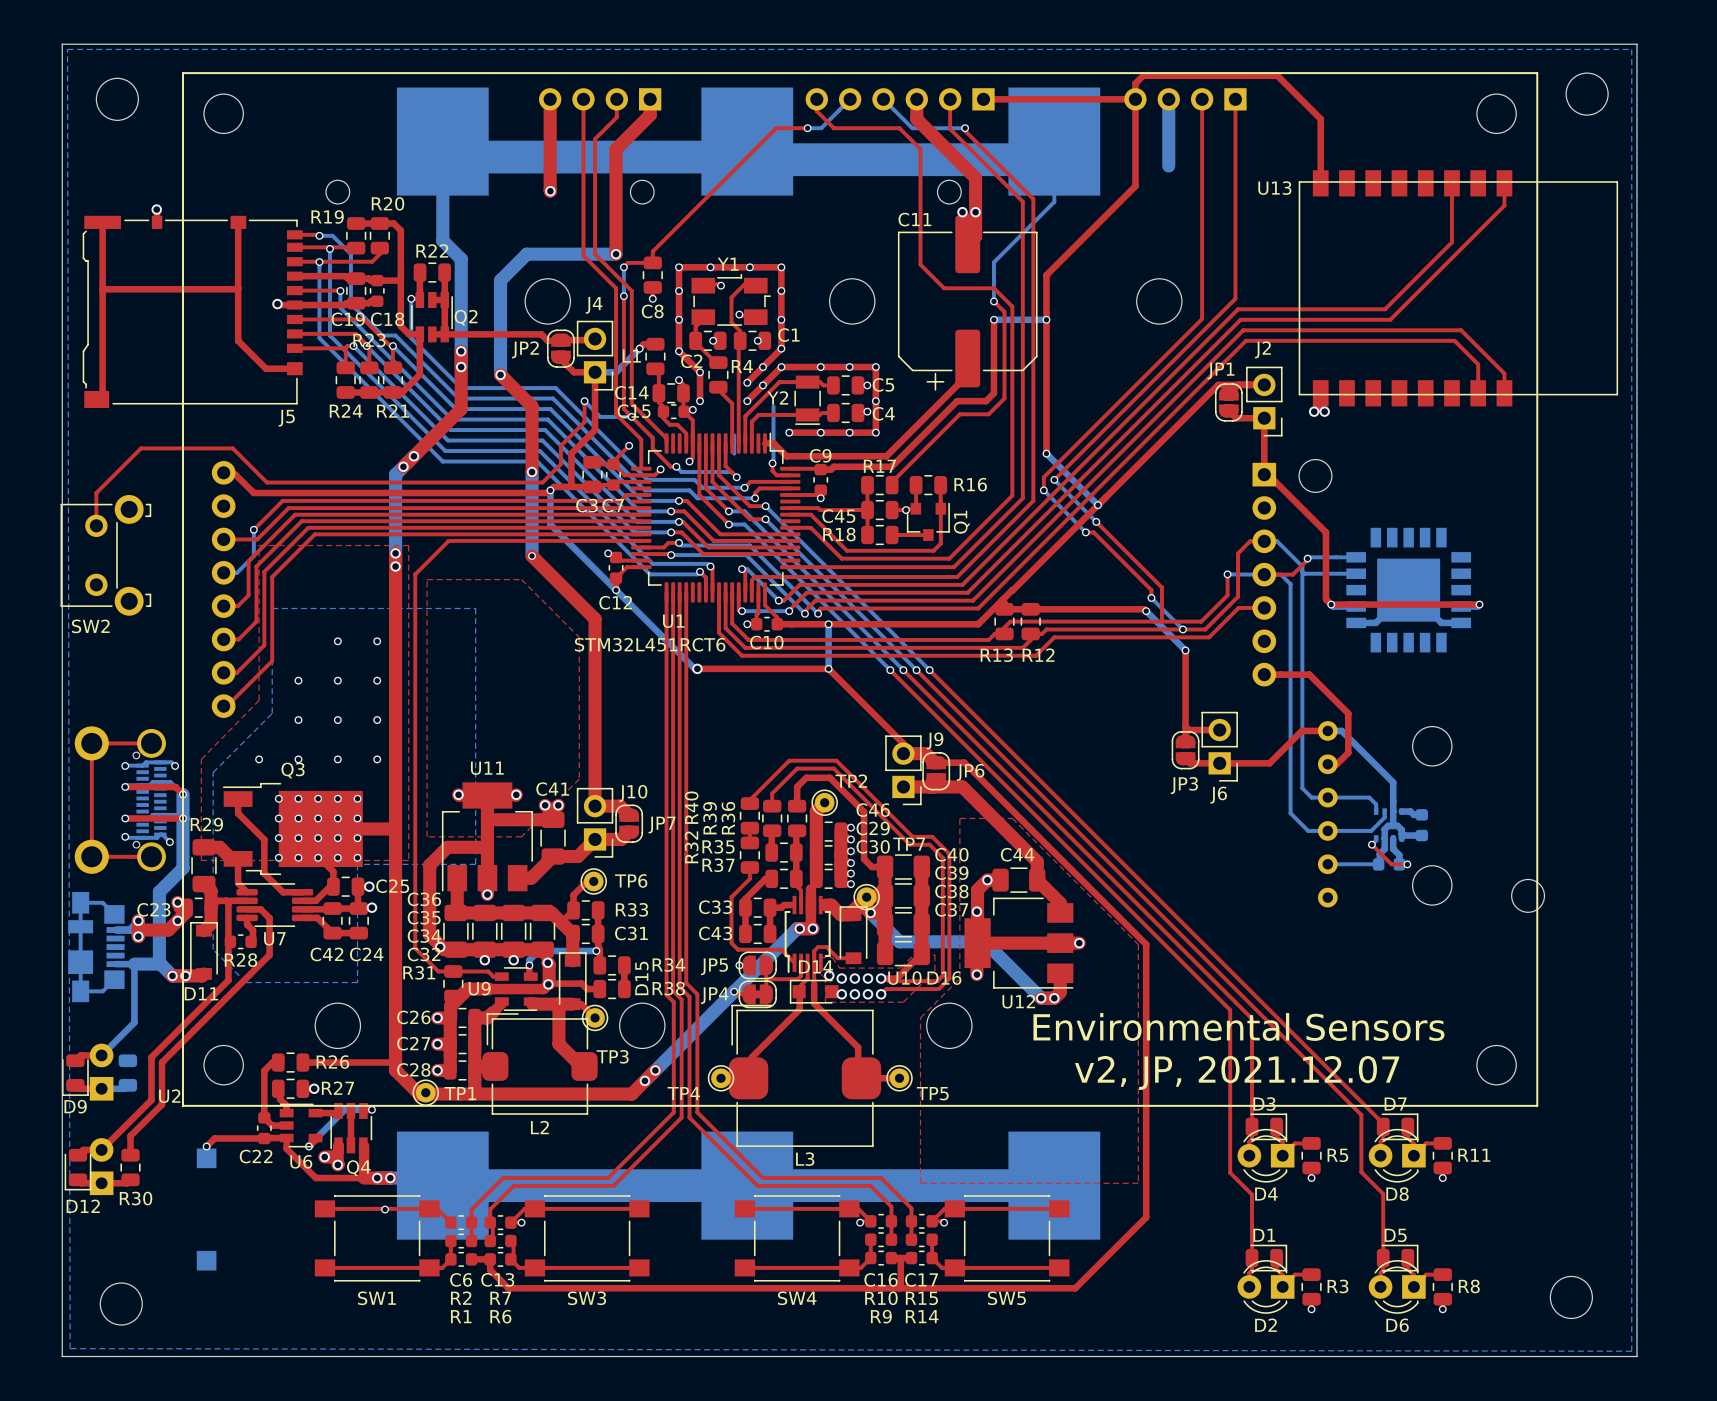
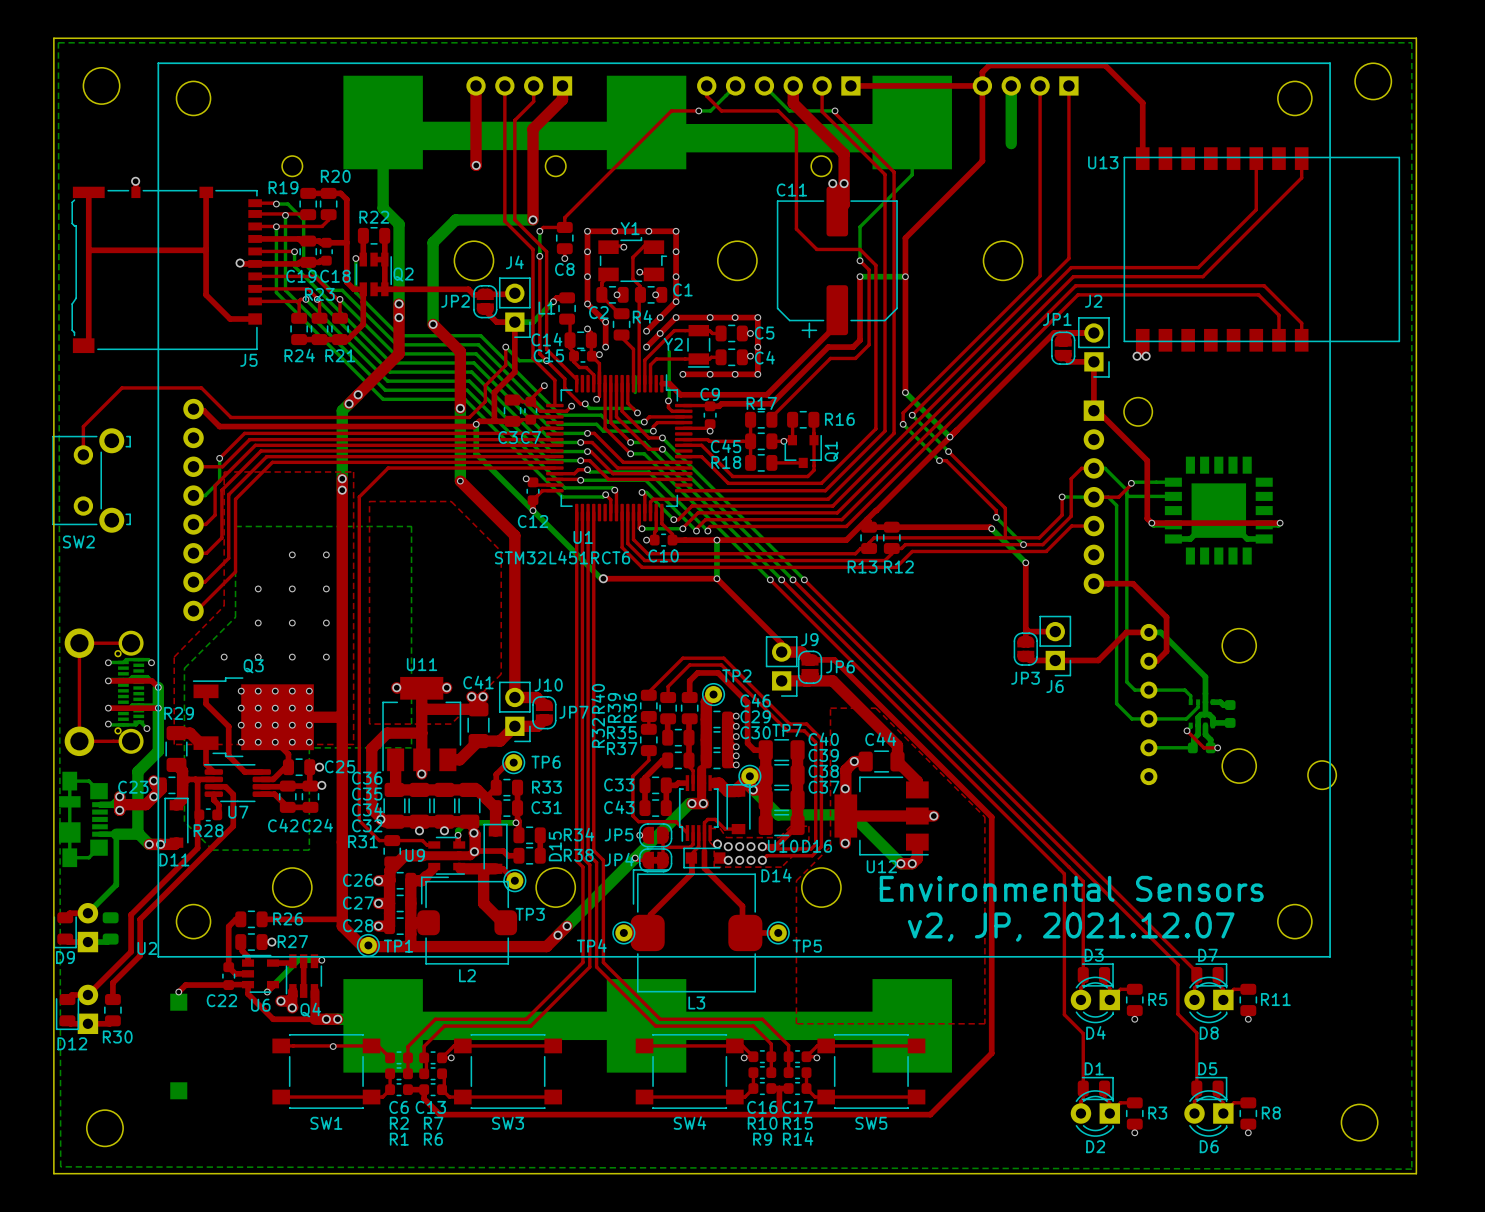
D14 name position: D14 (815, 966) -> D14 (776, 875)

